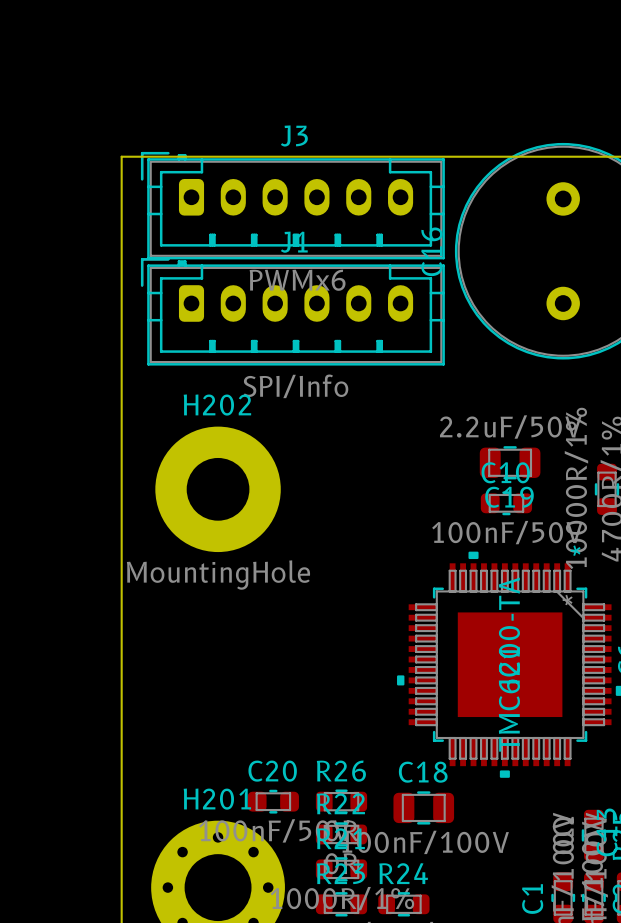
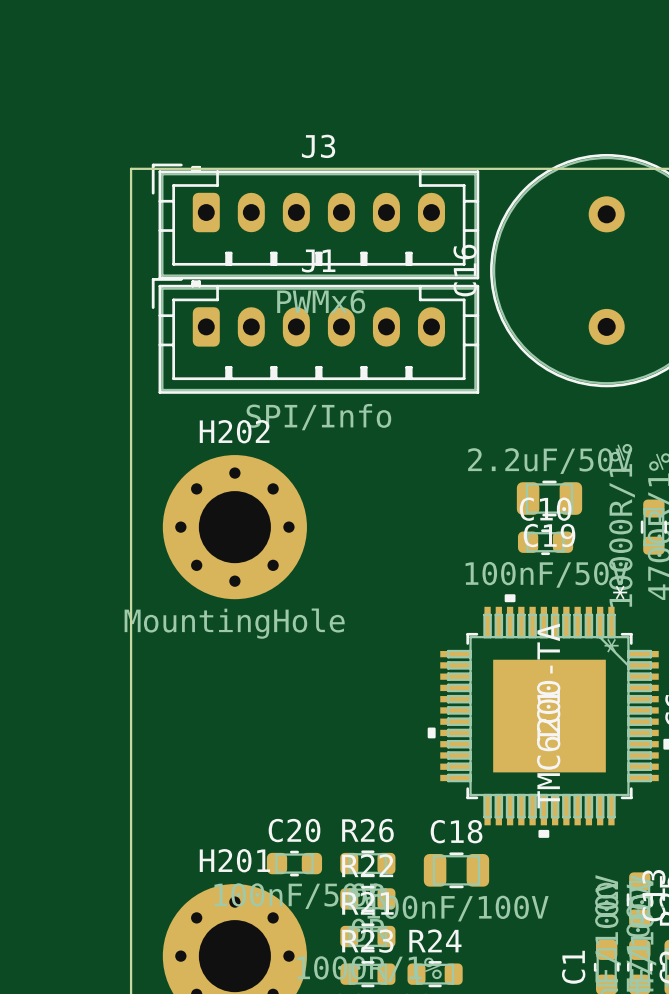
H202 footprint: [155, 426, 281, 553] -> [162, 455, 307, 600]

